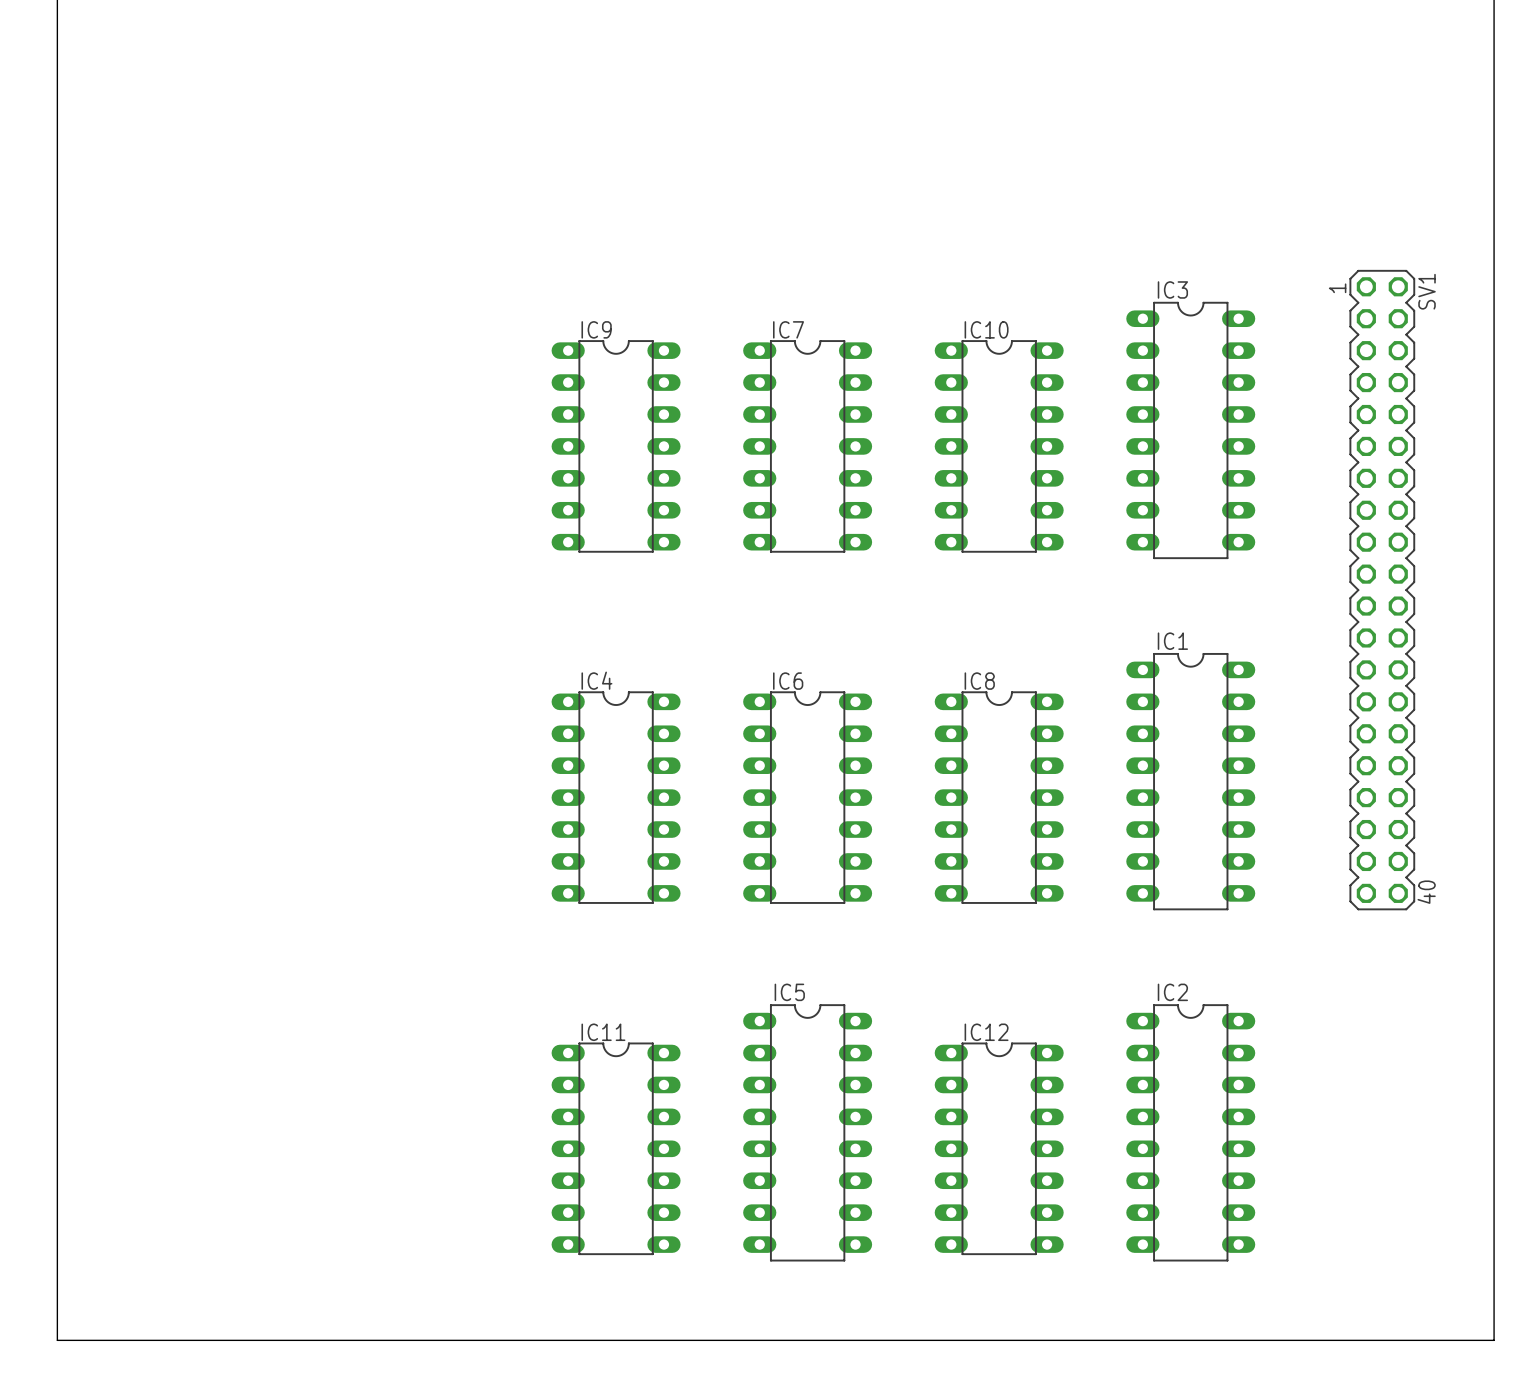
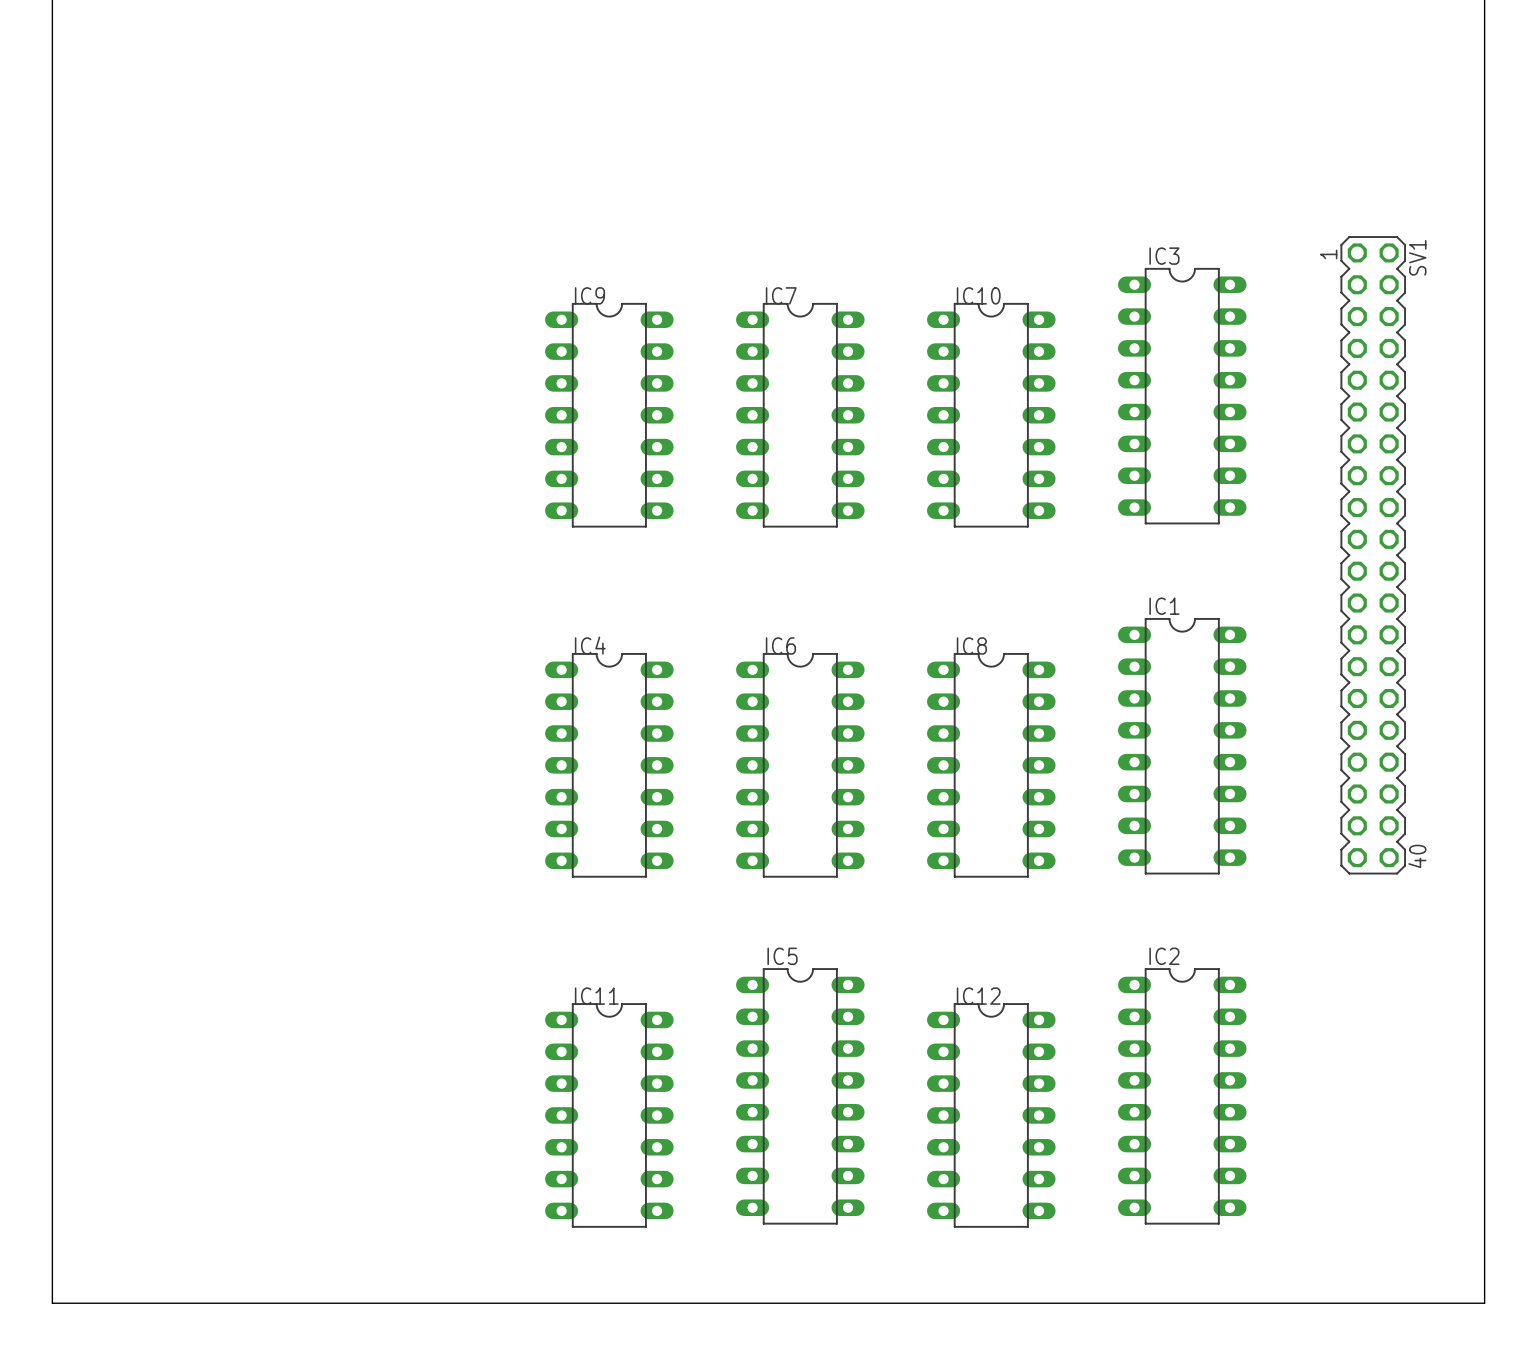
IC9 footprint: [551, 340, 681, 553] -> [545, 302, 674, 528]
IC7 footprint: [743, 340, 873, 553] -> [736, 302, 865, 528]
IC10 footprint: [934, 340, 1064, 553] -> [927, 302, 1056, 528]
IC4 footprint: [551, 691, 681, 904] -> [545, 652, 674, 878]
IC6 footprint: [743, 691, 873, 904] -> [736, 652, 865, 878]
IC8 footprint: [934, 691, 1064, 904] -> [927, 652, 1056, 878]
IC11 footprint: [551, 1042, 681, 1256] -> [545, 1003, 674, 1228]
IC12 footprint: [934, 1042, 1064, 1256] -> [927, 1003, 1056, 1228]

